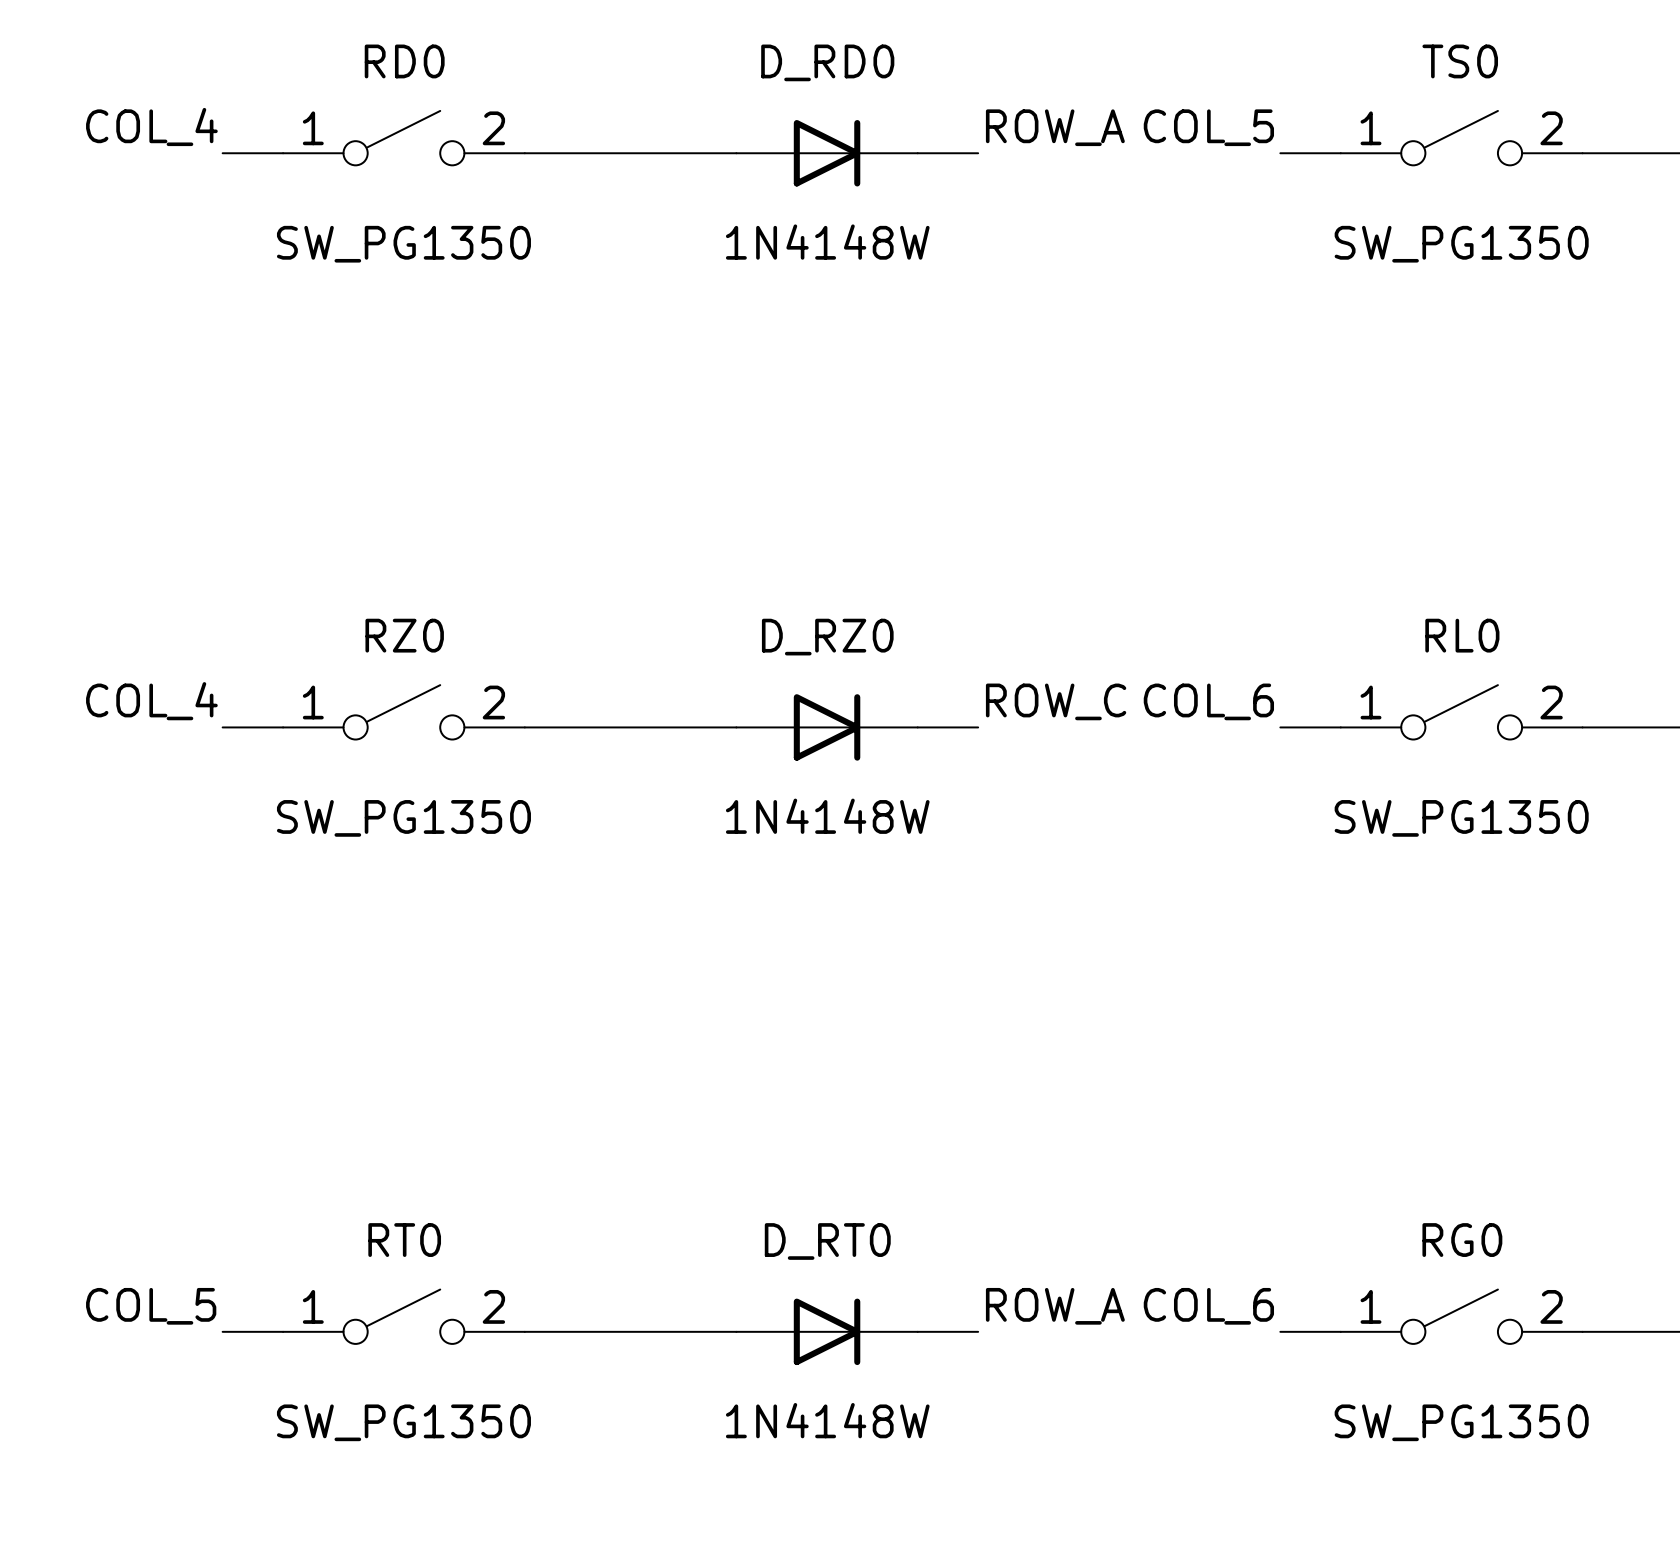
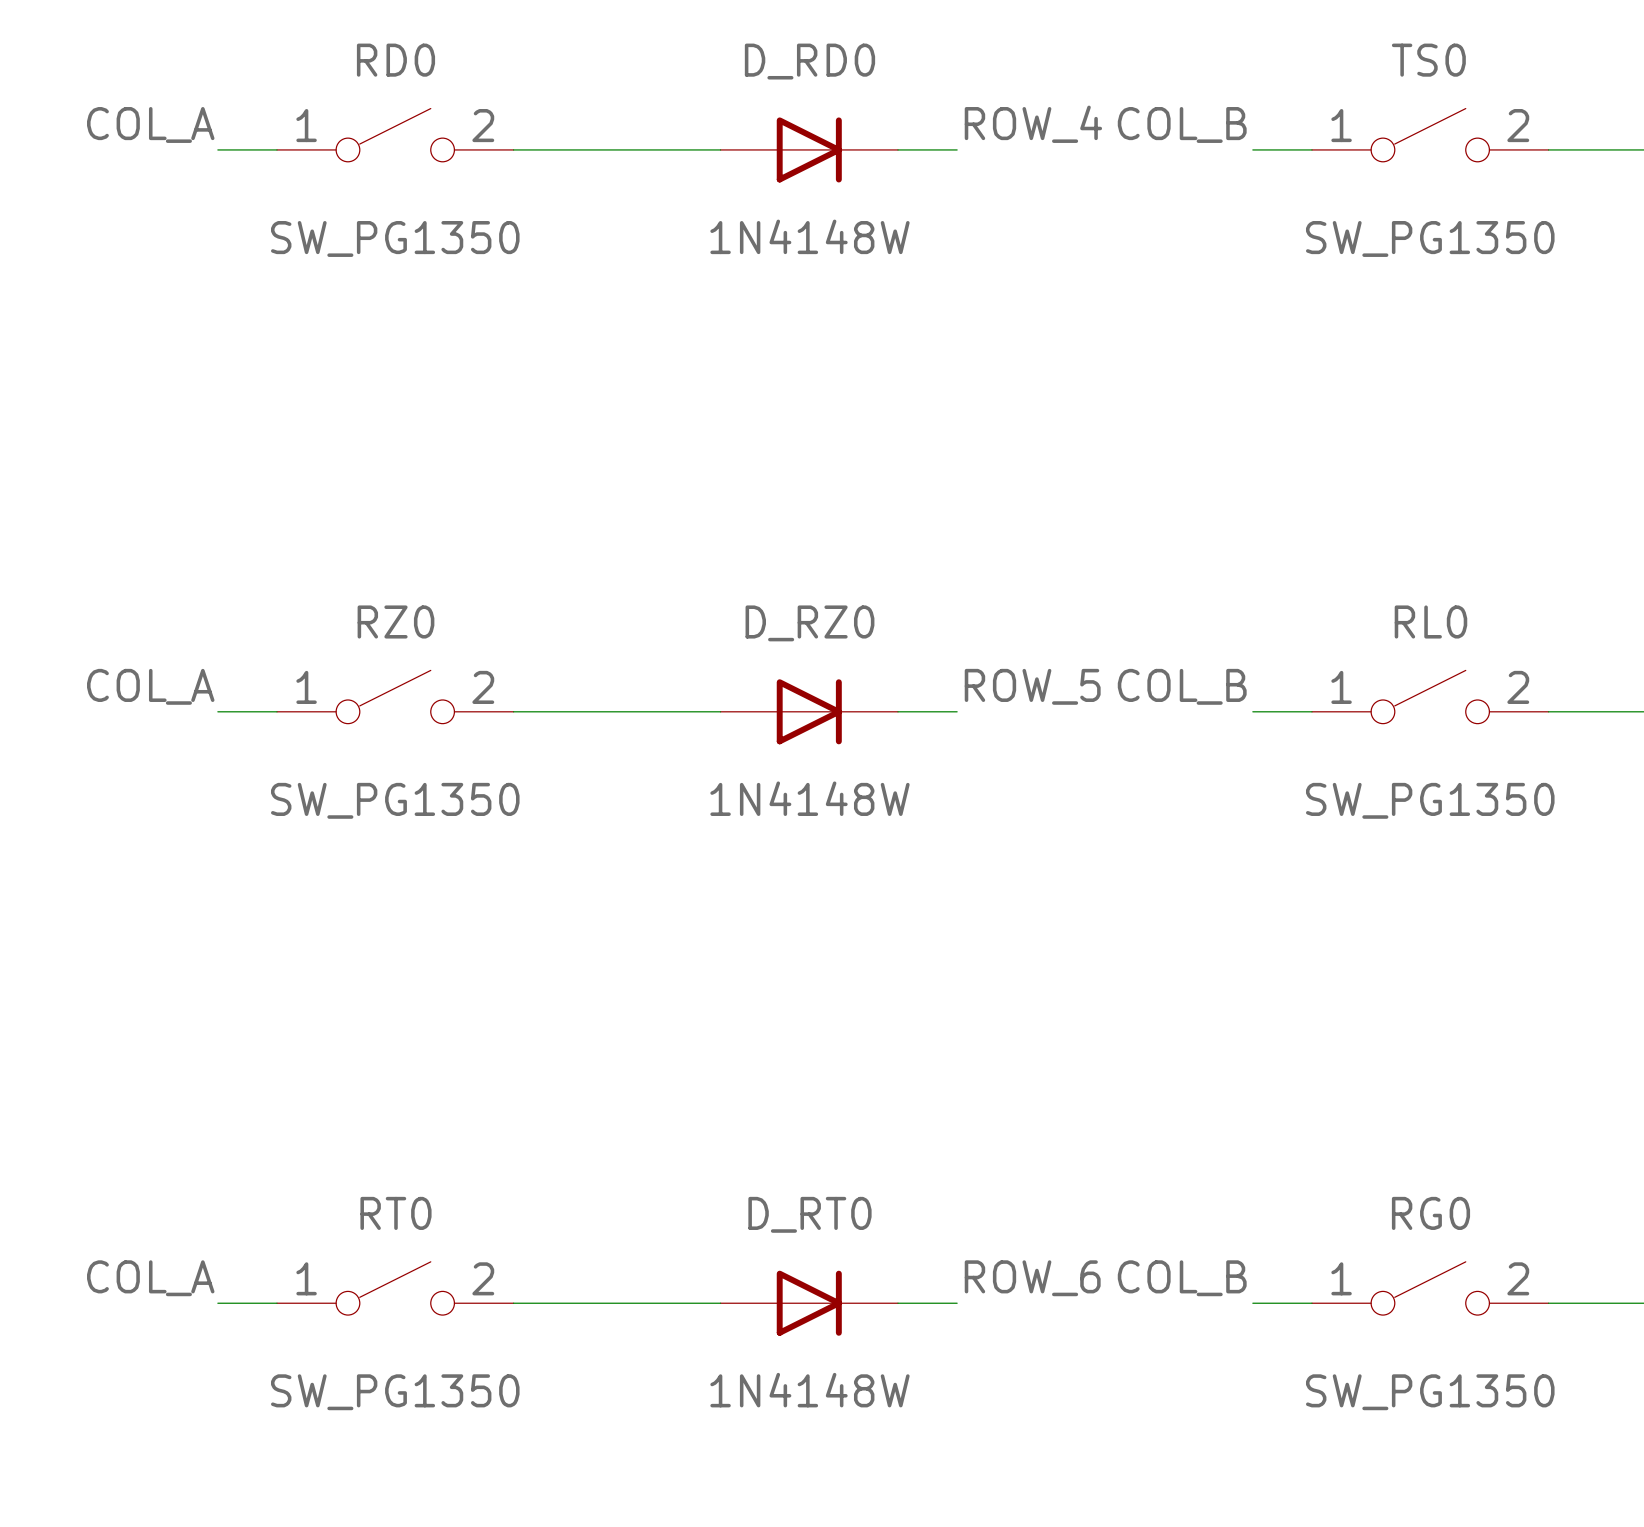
label: COL_4 (151, 127) -> COL_A (150, 124)
label: ROW_A (1055, 127) -> ROW_4 (1033, 124)
label: COL_5 (1208, 127) -> COL_B (1182, 124)
label: COL_4 (151, 701) -> COL_A (150, 686)
label: ROW_C (1056, 701) -> ROW_5 (1032, 686)
label: COL_6 (1208, 701) -> COL_B (1182, 686)
label: COL_5 (151, 1306) -> COL_A (150, 1278)
label: ROW_A (1055, 1306) -> ROW_6 (1032, 1278)
label: COL_6 (1208, 1306) -> COL_B (1182, 1278)

